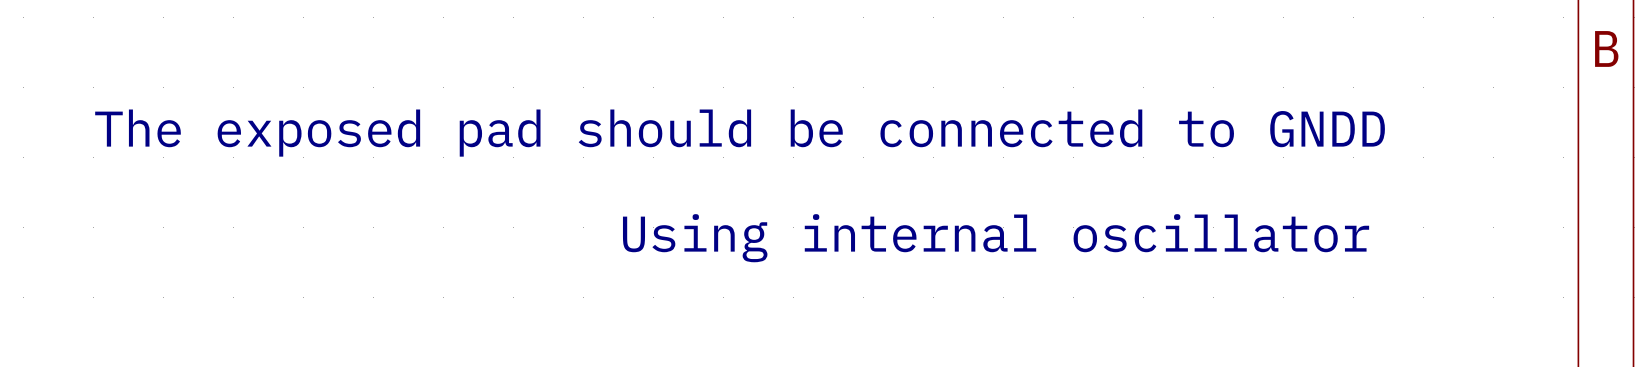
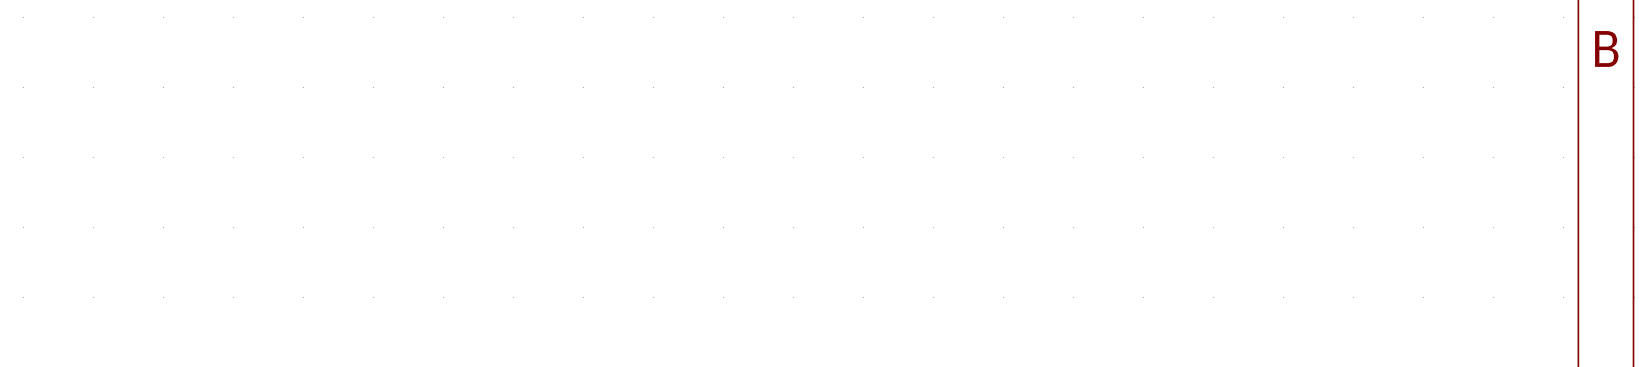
text: The exposed pad should be connected to GNDD (740, 133) -> none
text: Using internal oscillator (996, 238) -> none

